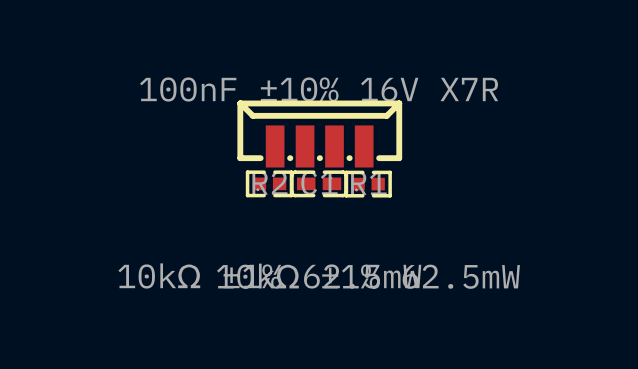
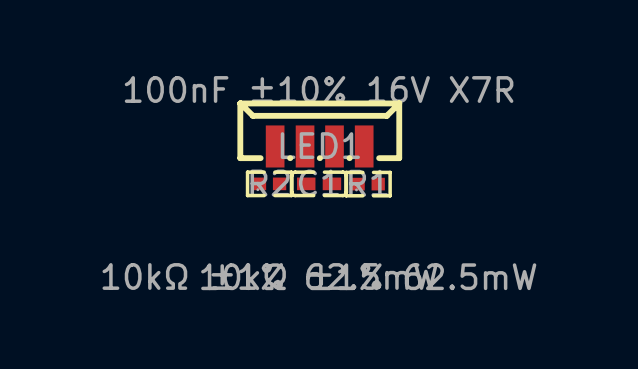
LED1 name: none -> LED1 (320, 145)

